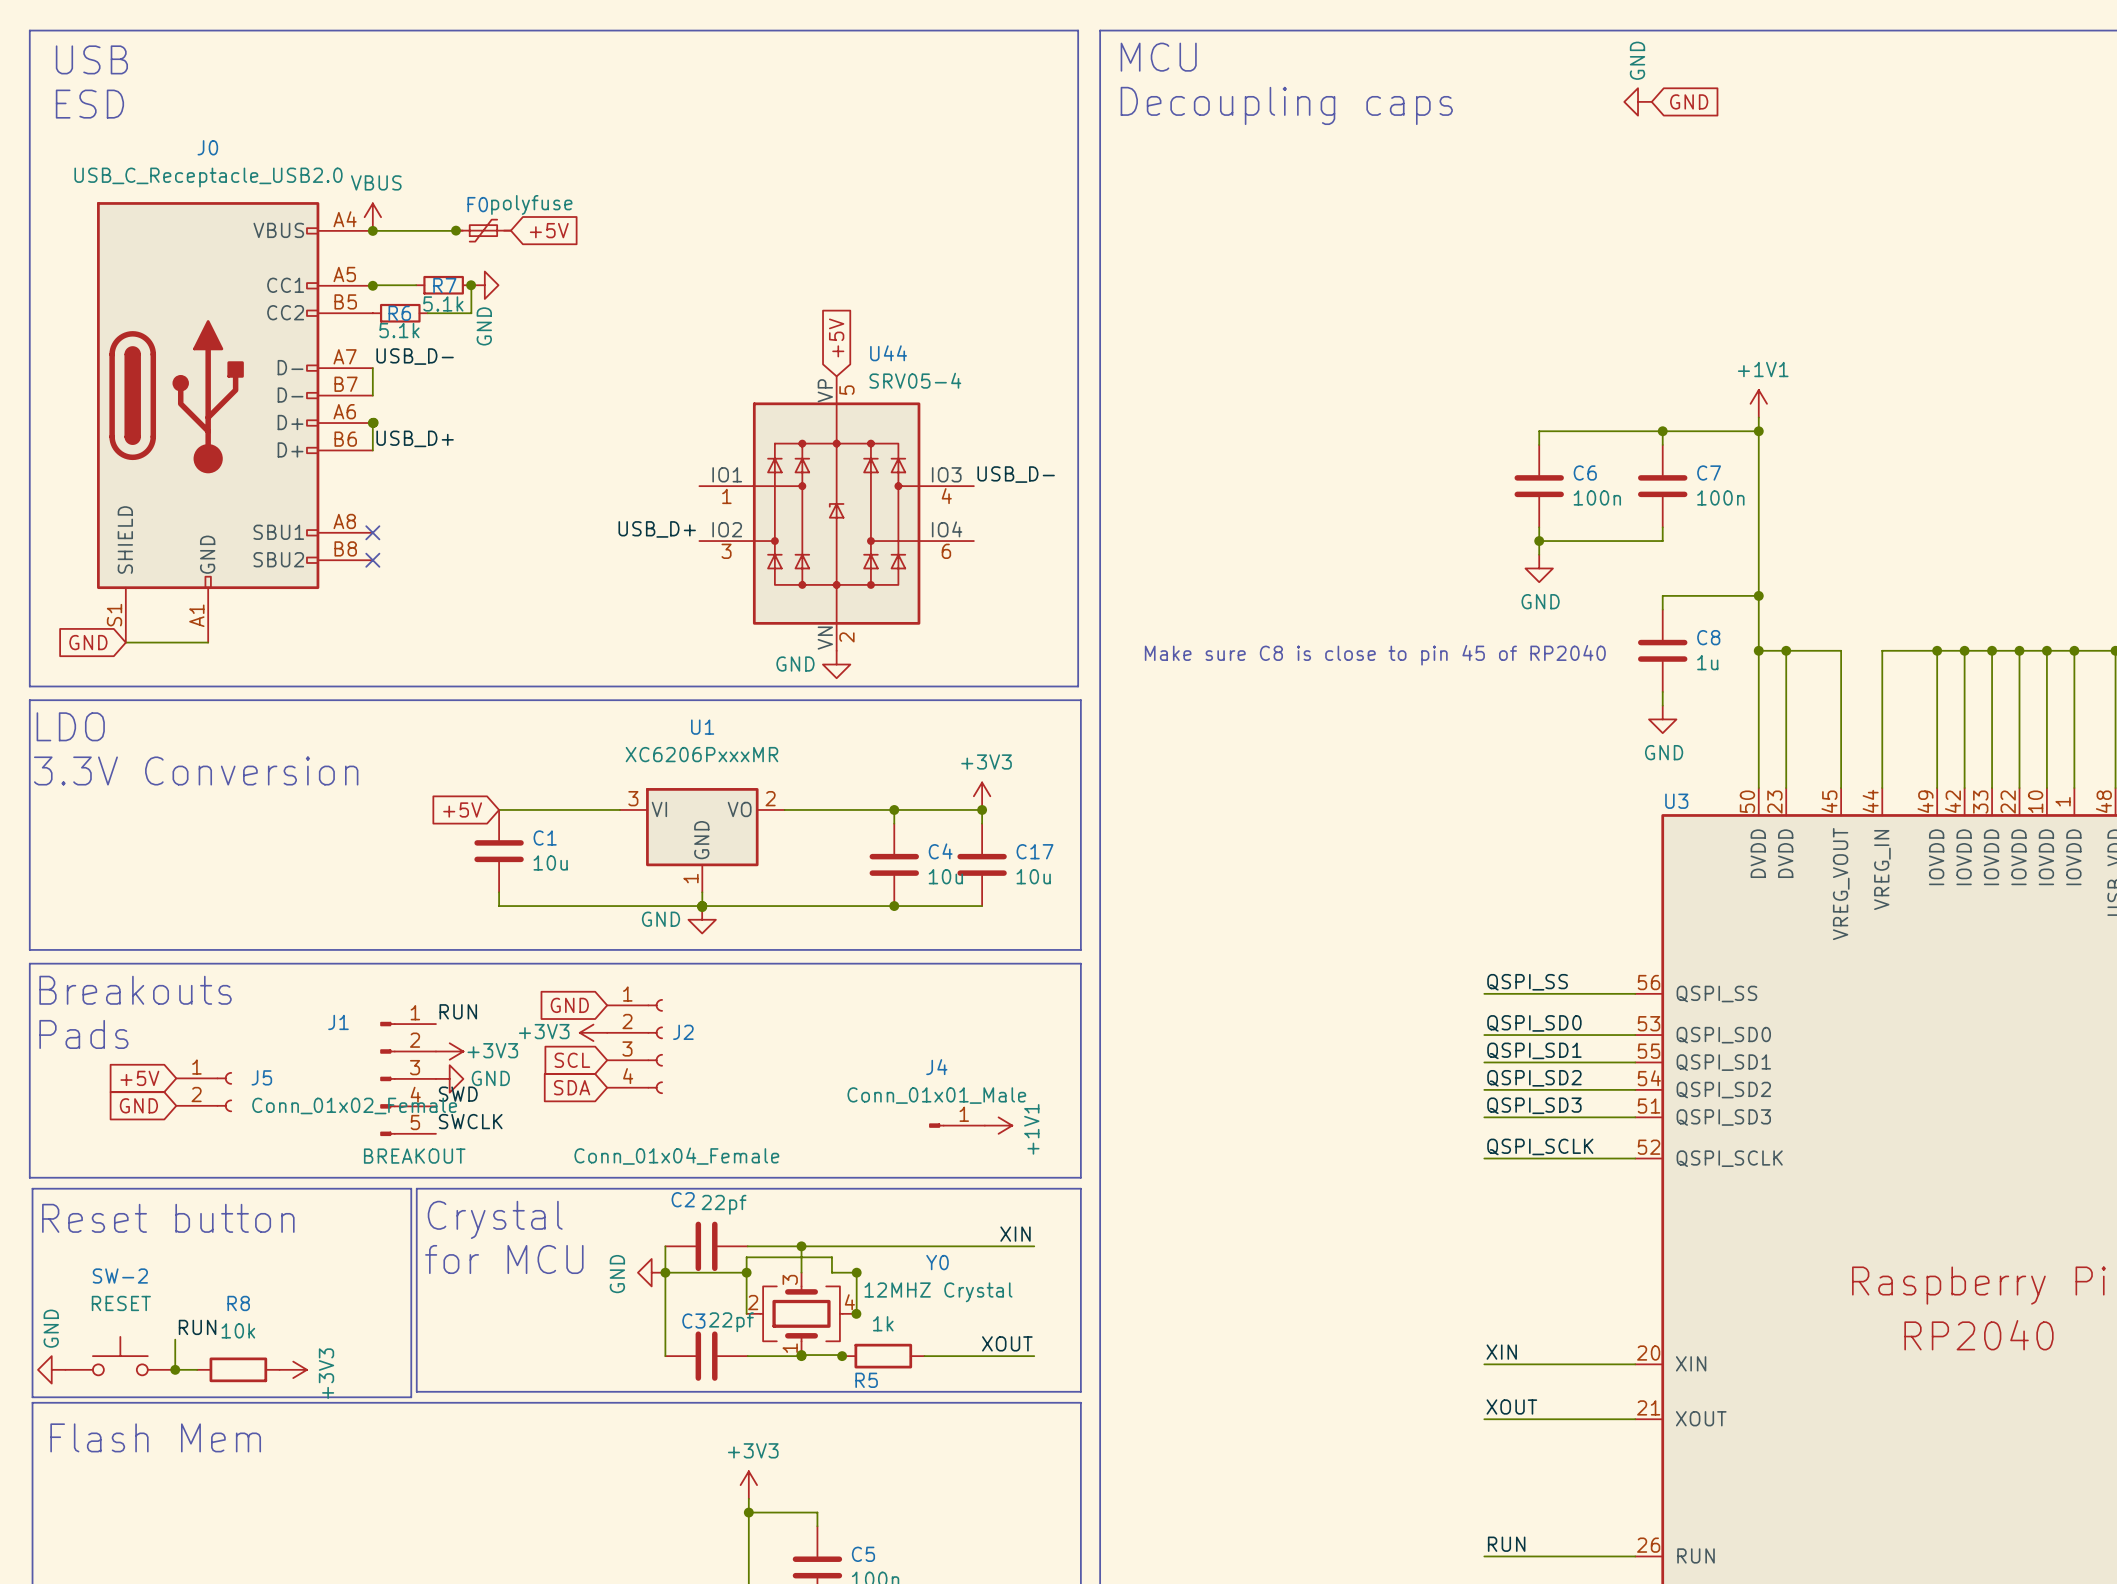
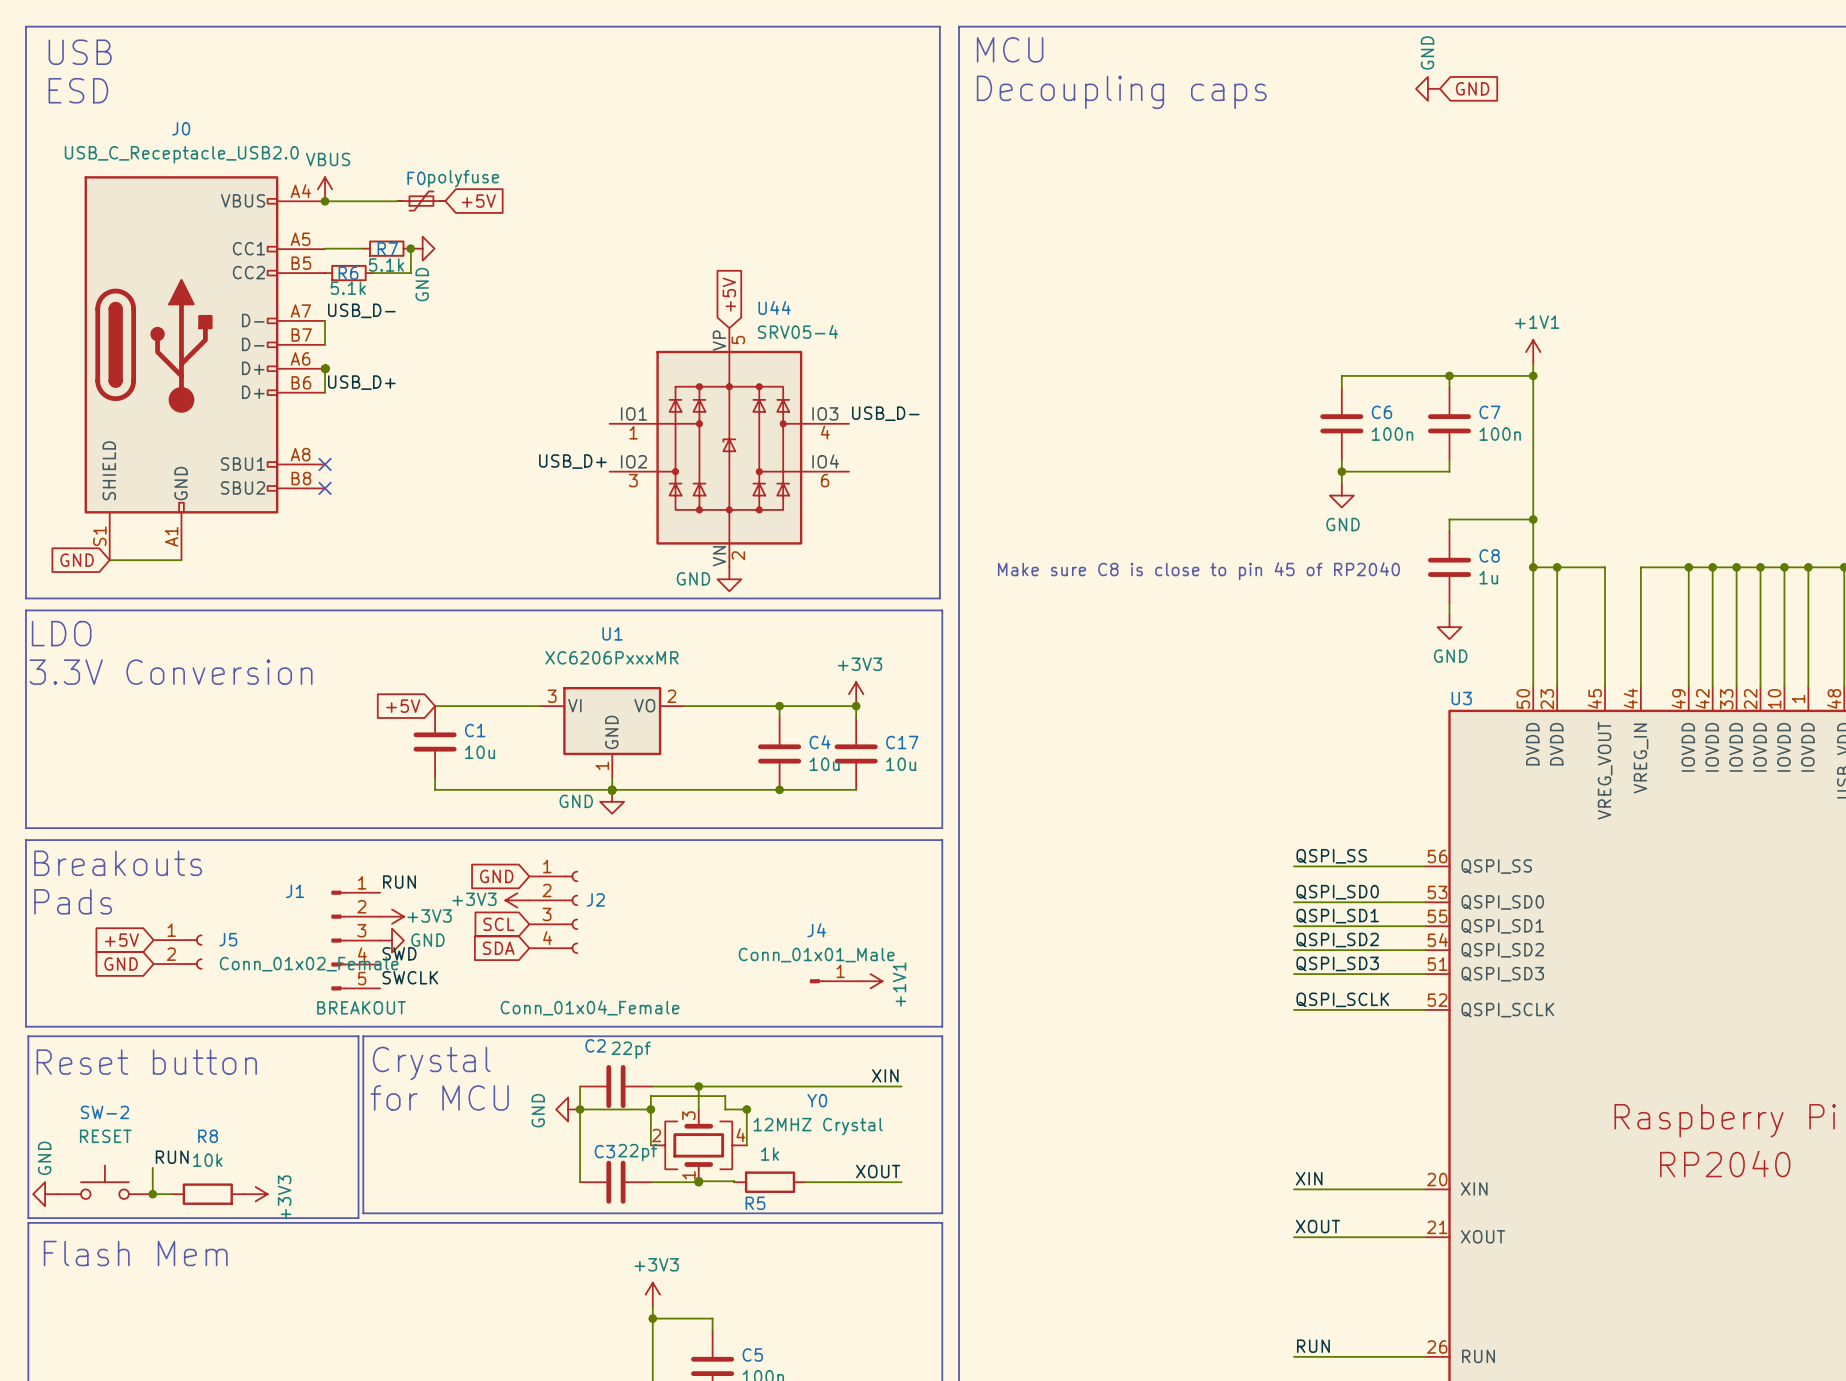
junction: (455, 230) -> none
junction: (372, 285) -> none
junction: (856, 1313) -> none
junction: (842, 1356) -> none

